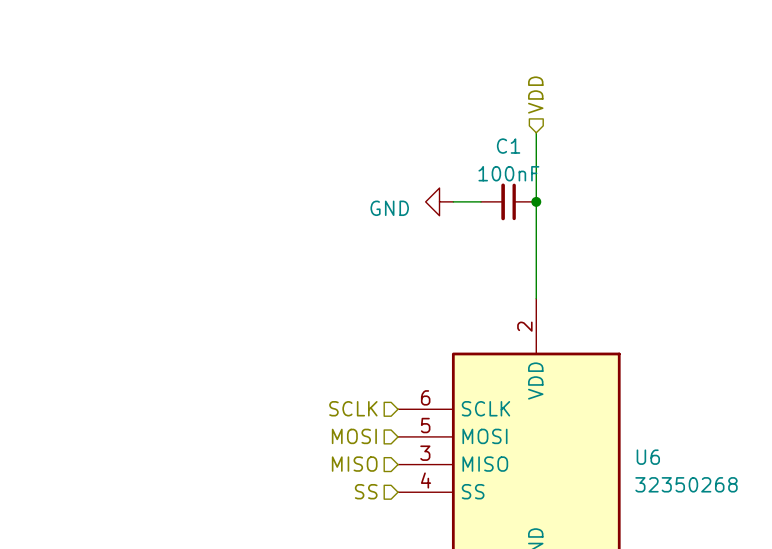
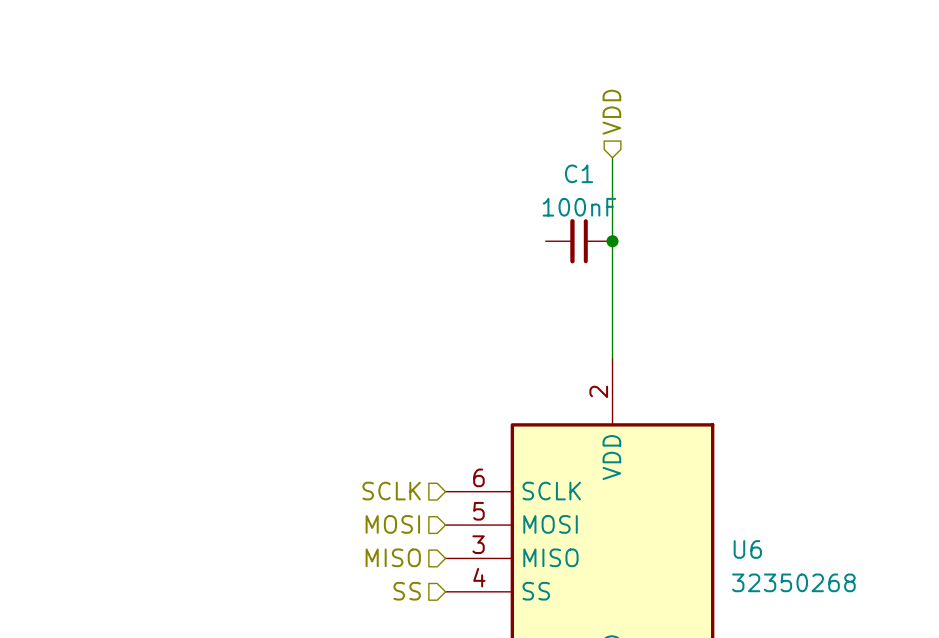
power symbol: GND (439, 201) -> none
wire: (453, 201) (480, 201) -> none

